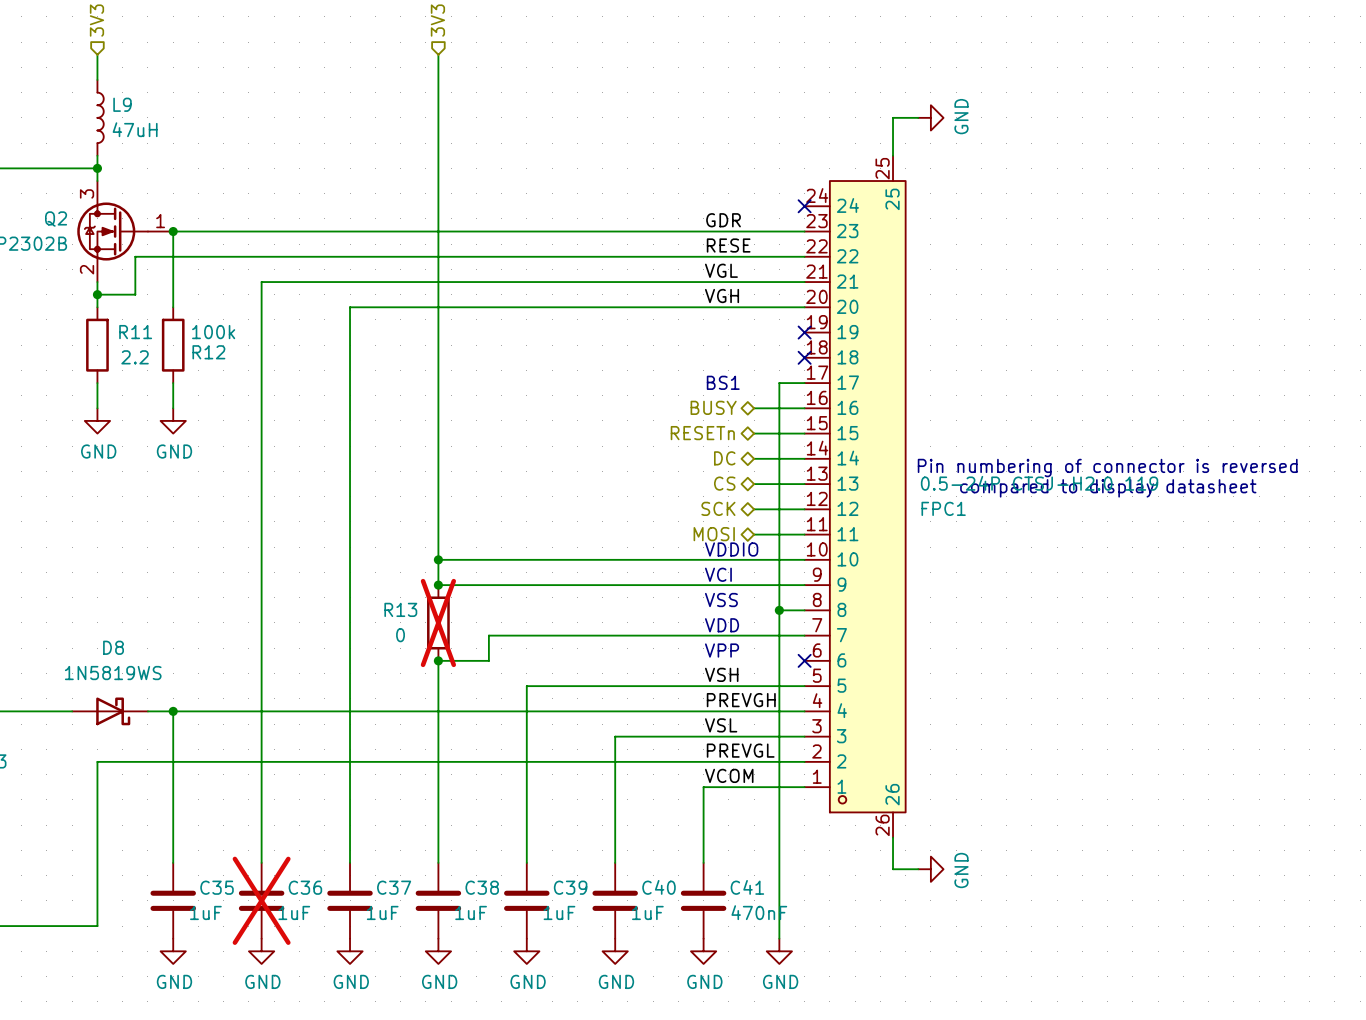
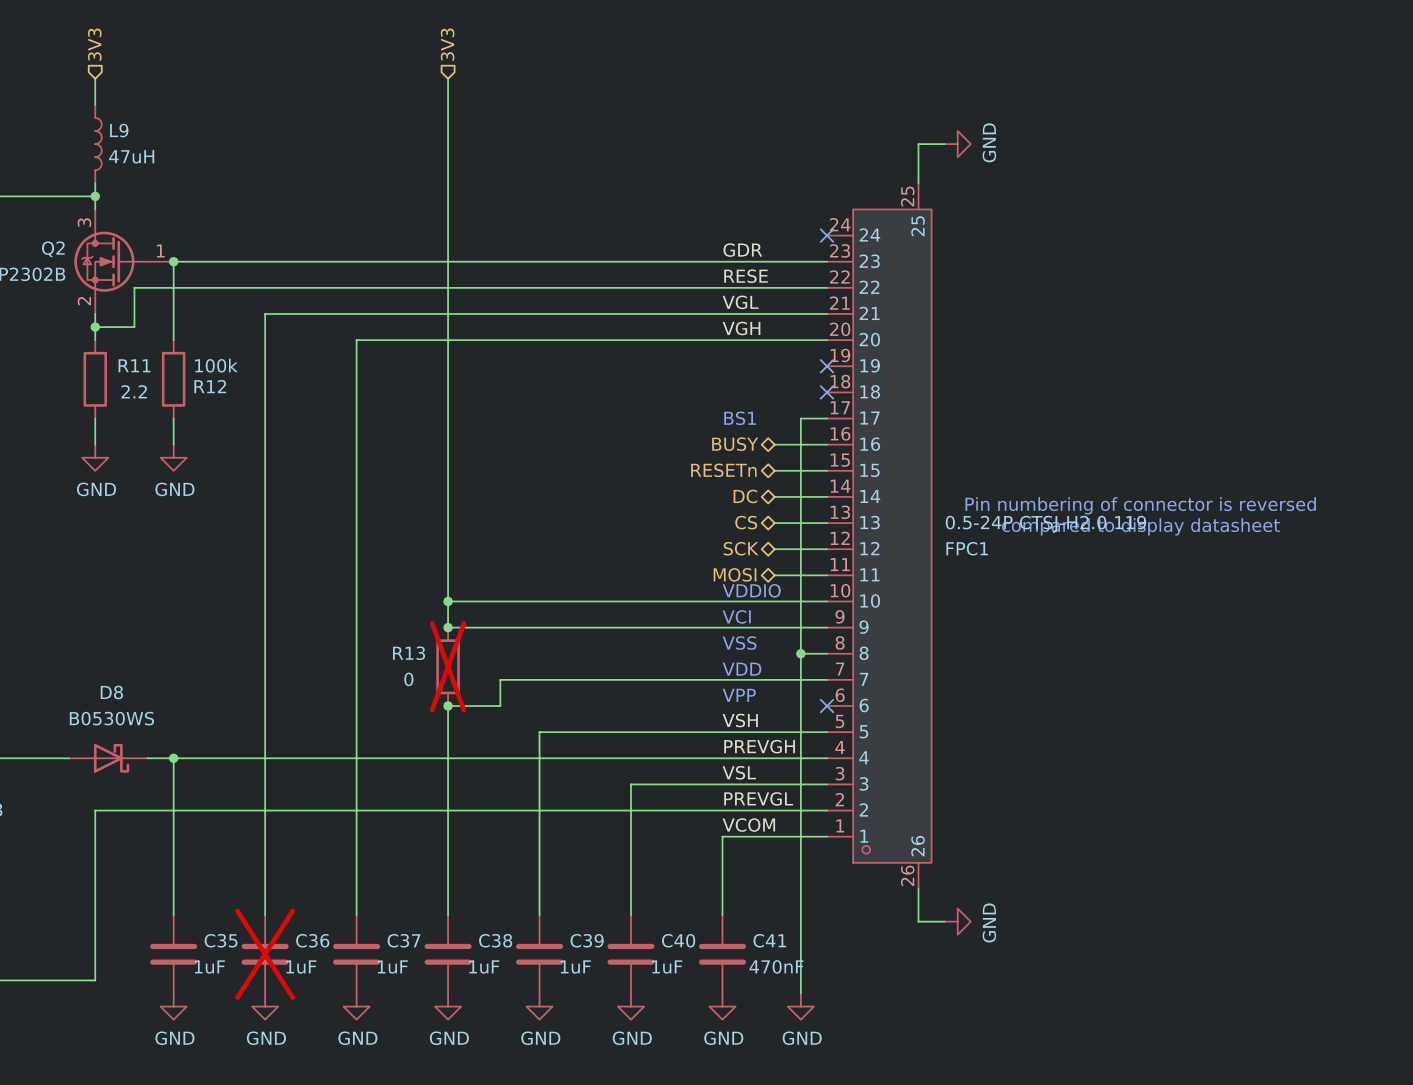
D8 value: 1N5819WS (113, 673) -> B0530WS (111, 718)

